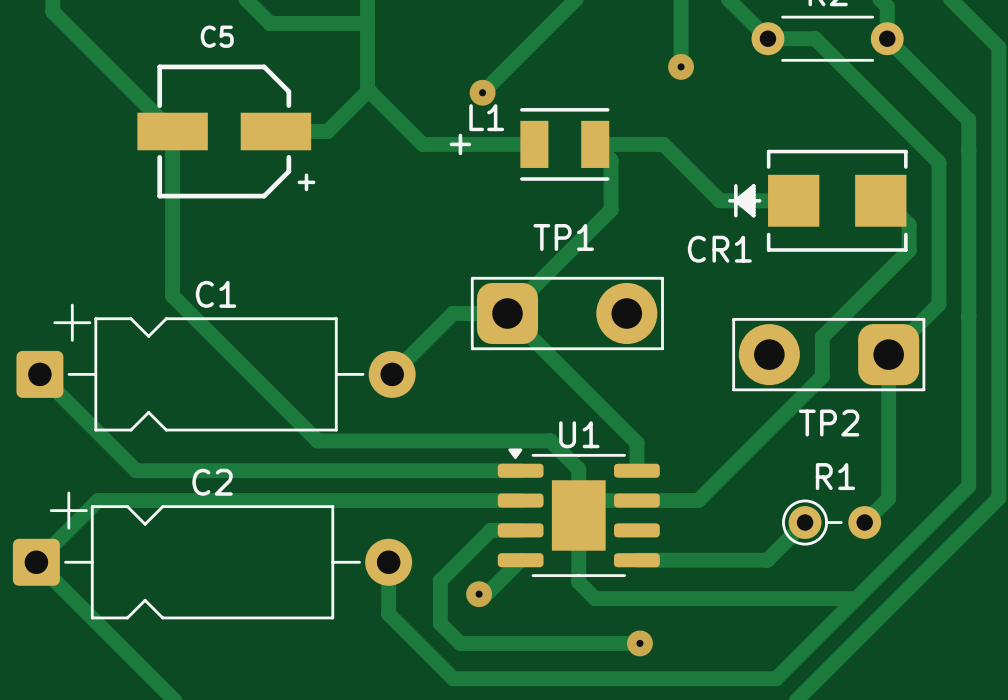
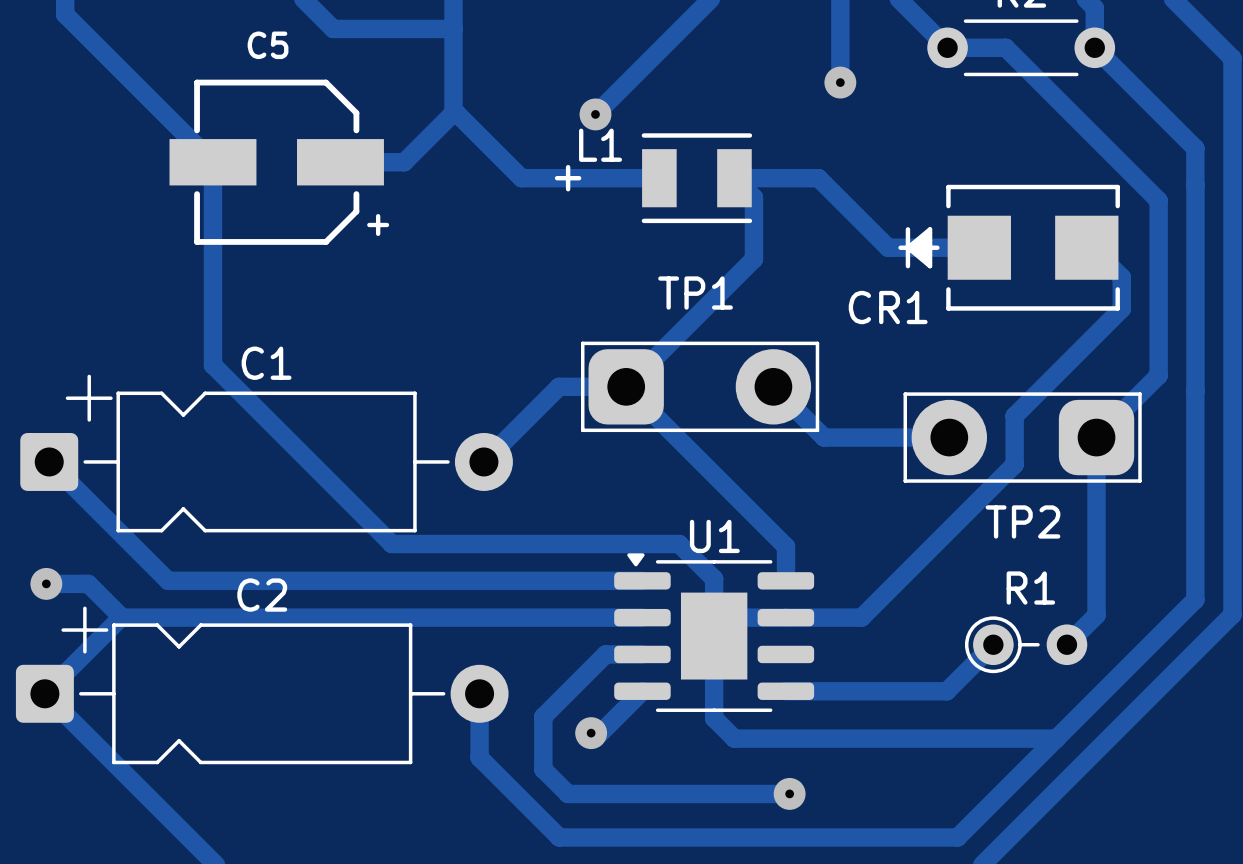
track: none -> (773, 386) (824, 437) (949, 437)
track: none -> (46, 583) (88, 583) (121, 617)
via: none -> (46, 583)

